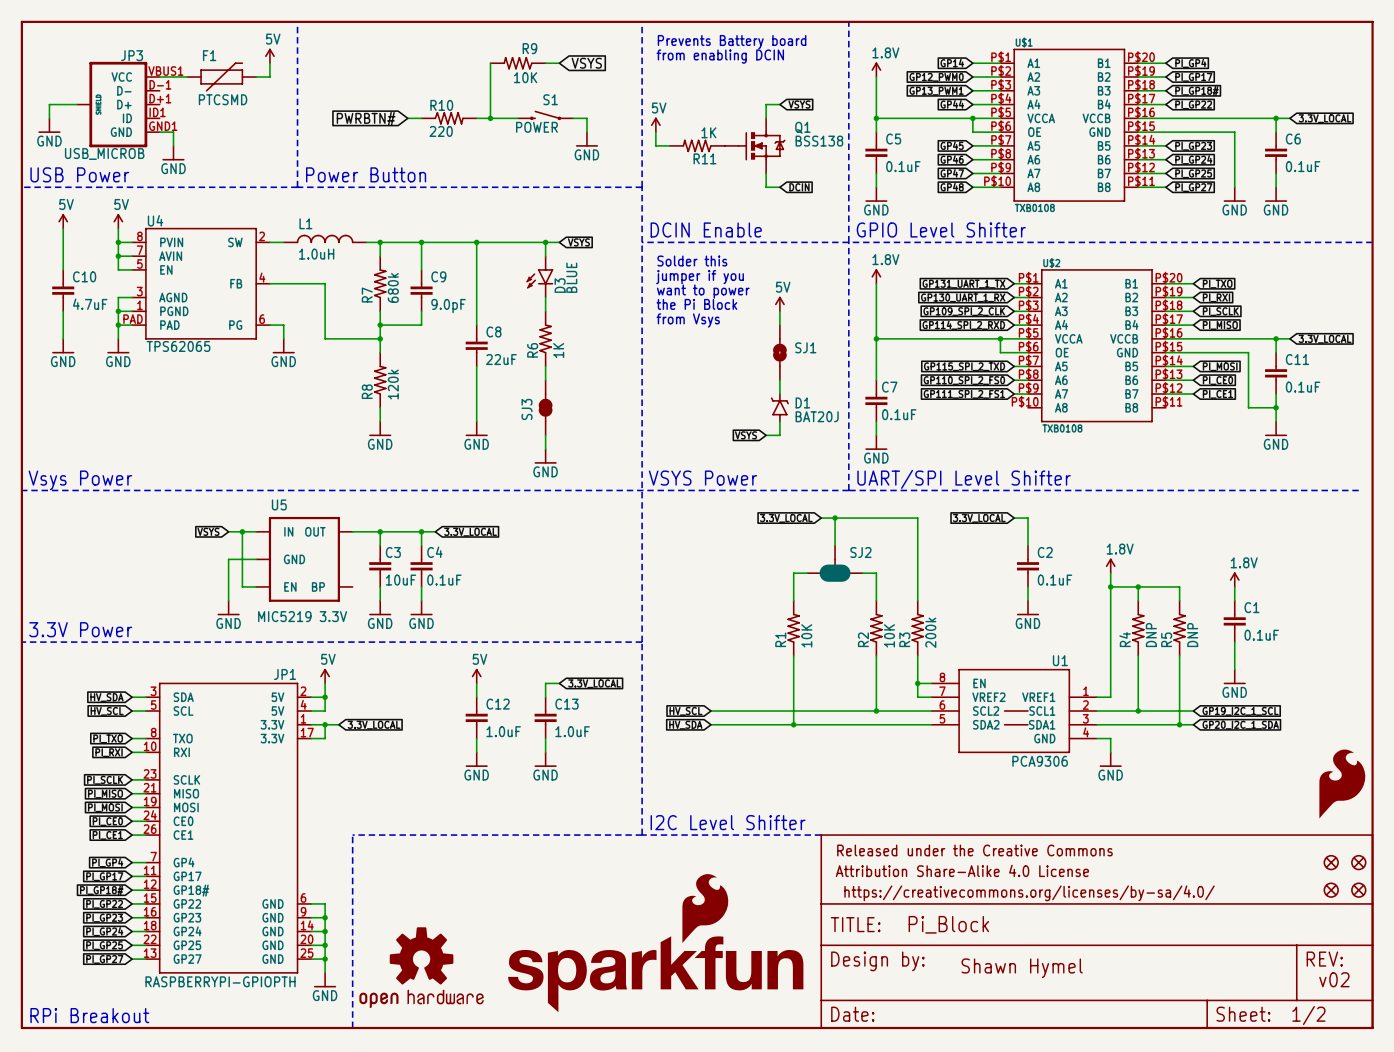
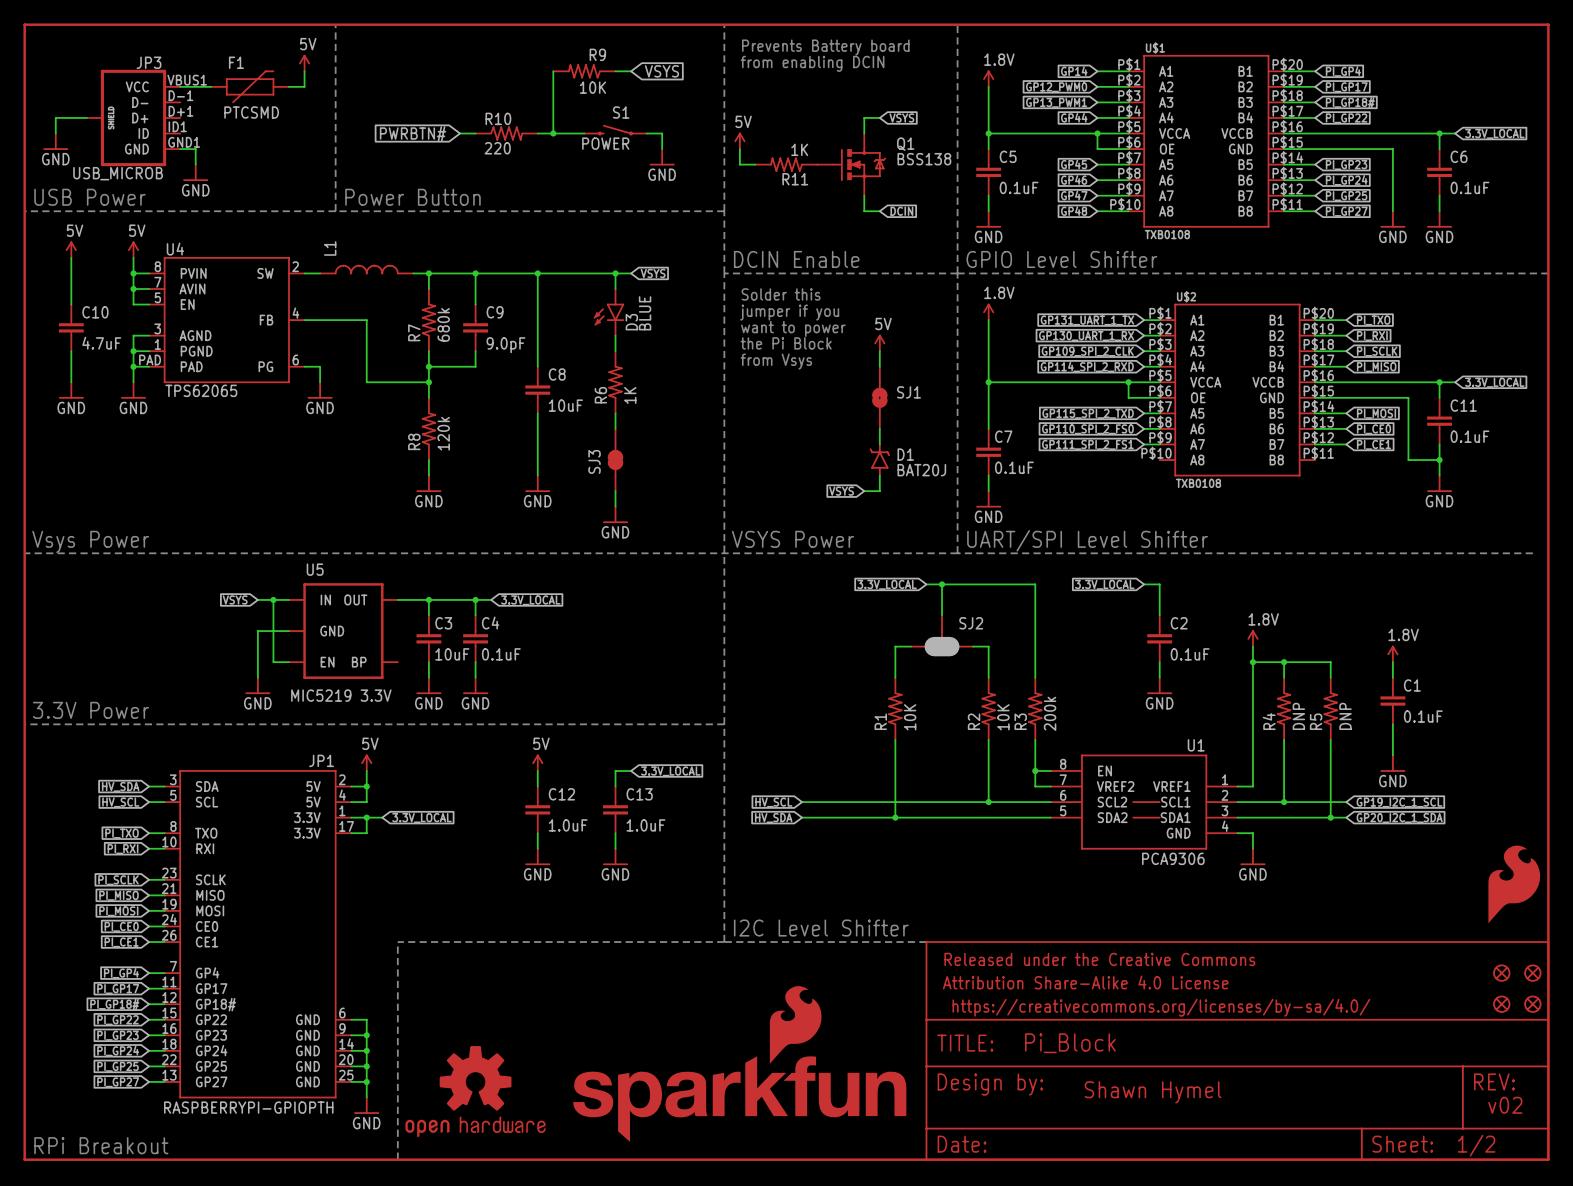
L1 name rotation: 0° (305, 223) -> 90° counterclockwise (330, 248)
L1 value: 1.0uH (316, 254) -> none
C8 value: 22uF (501, 359) -> 10uF (565, 405)

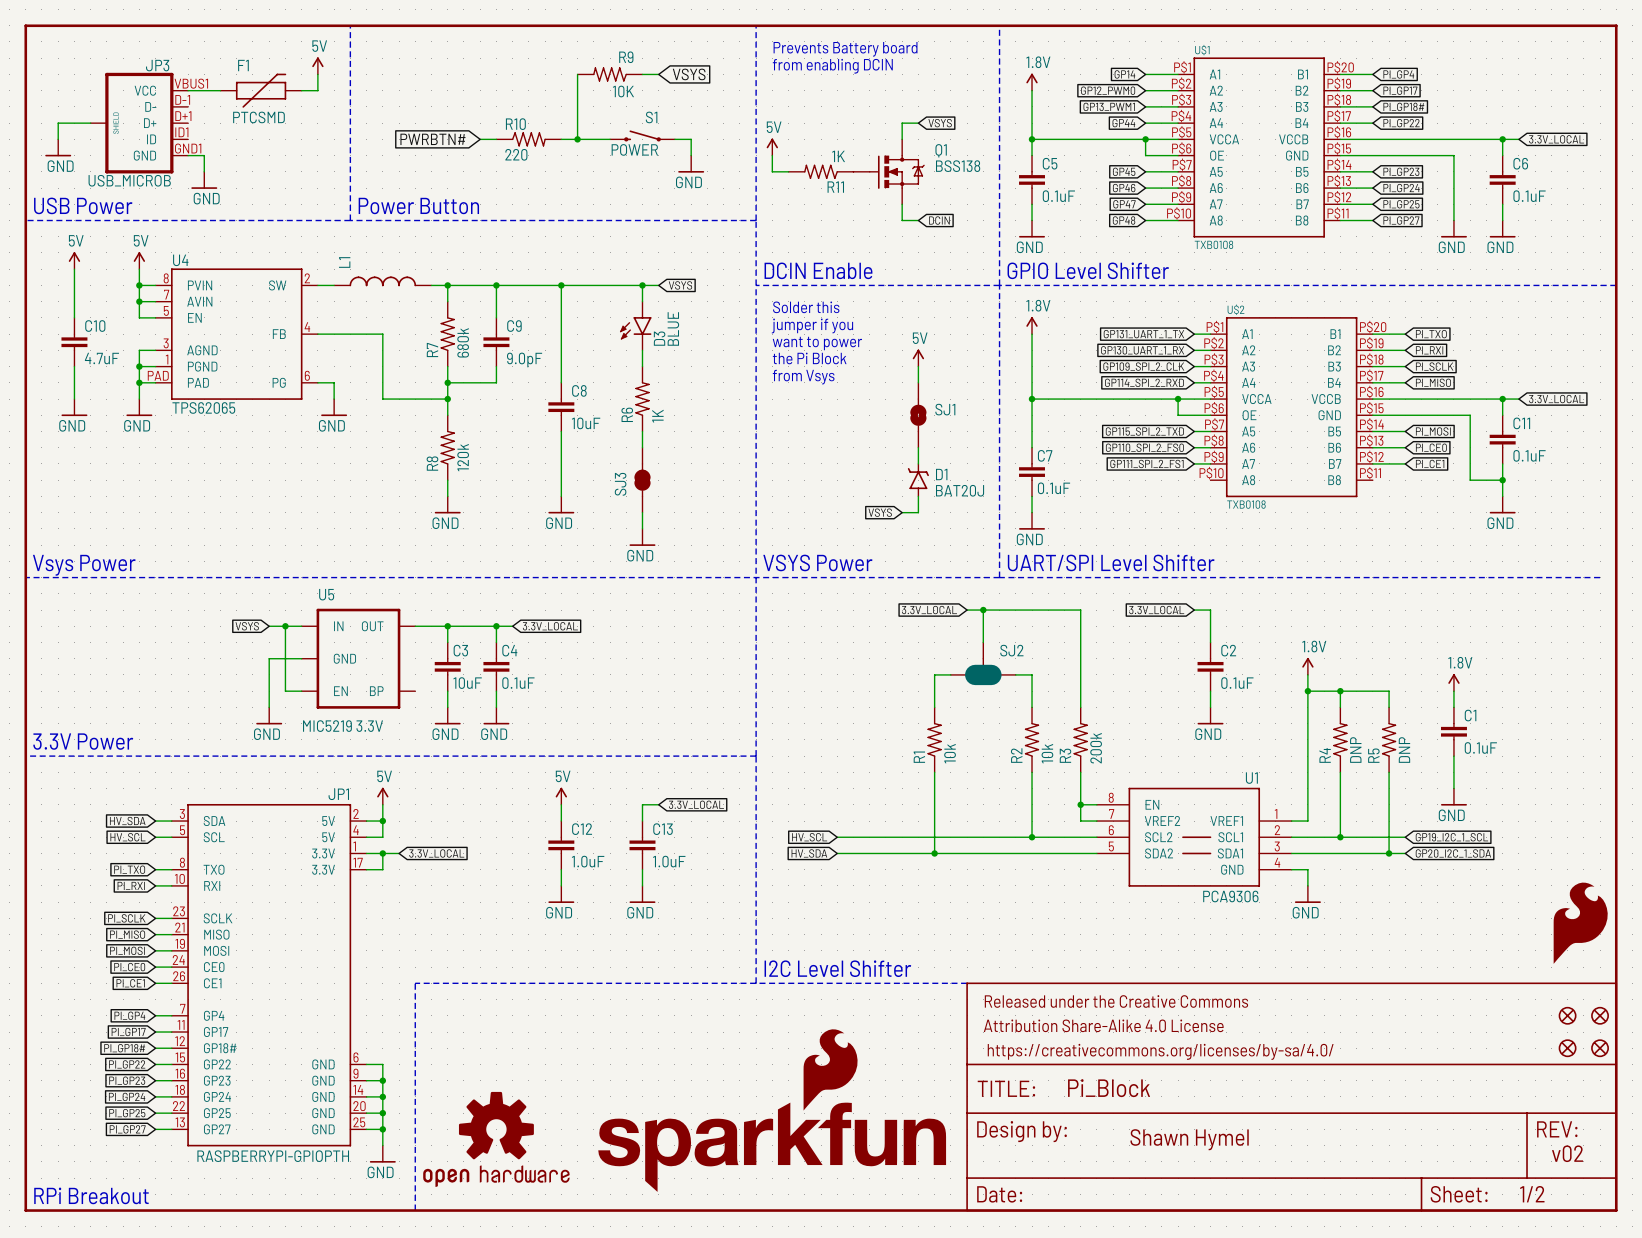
R1 value: 10K (910, 717) -> 10k (950, 753)
R2 value: 10K (1003, 717) -> 10k (1047, 753)

